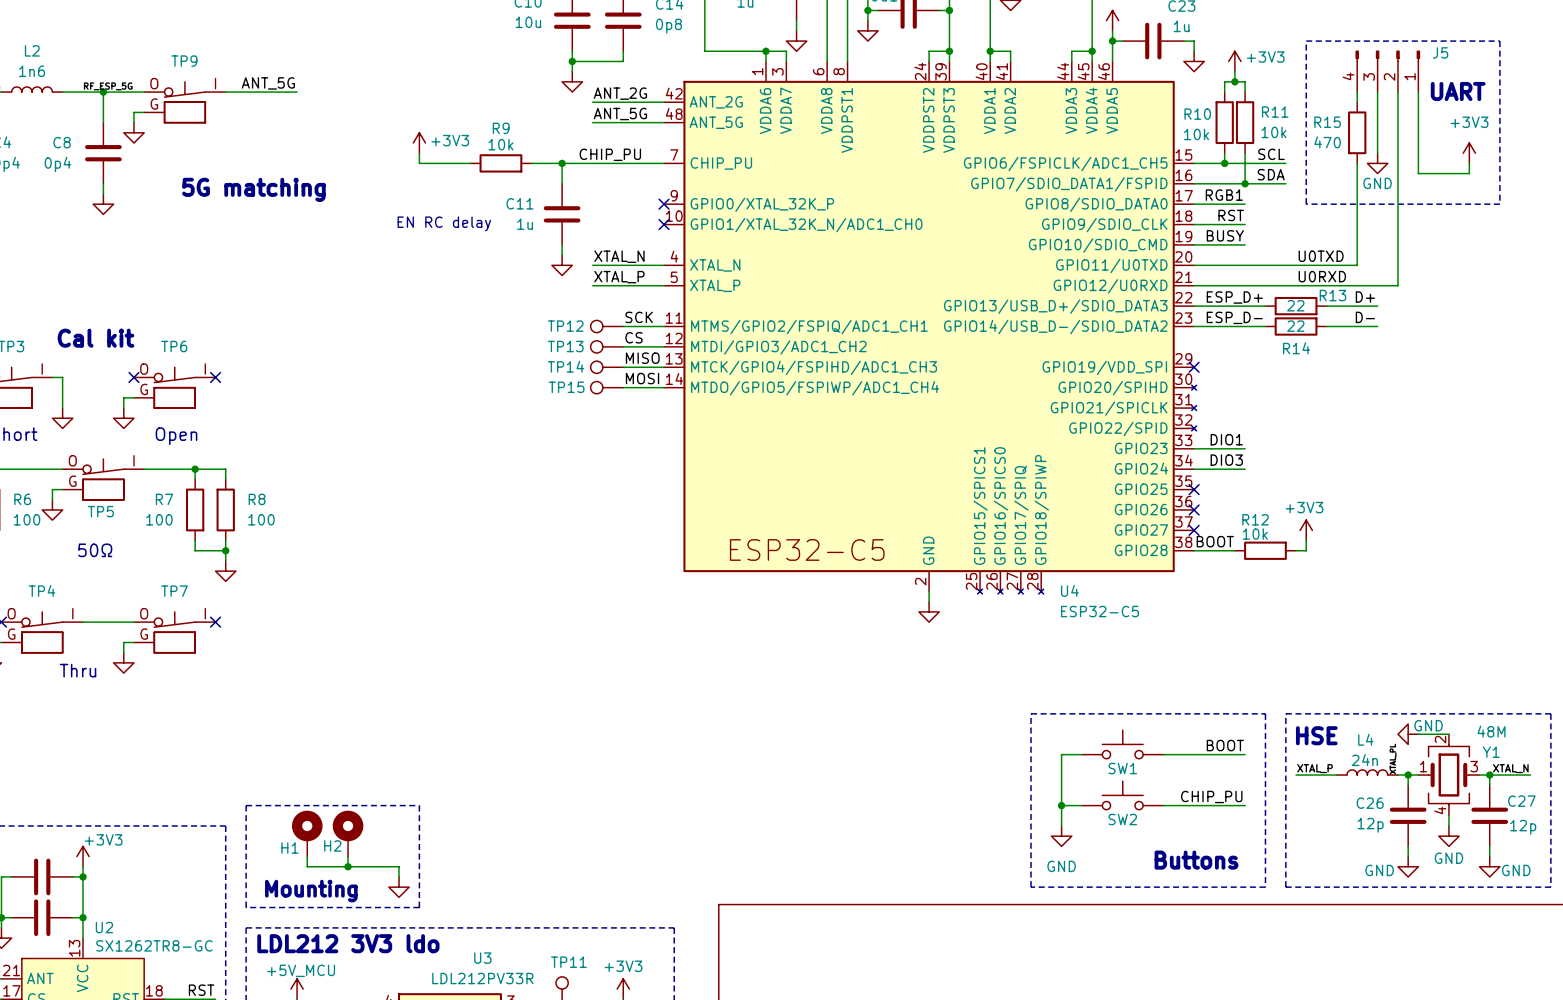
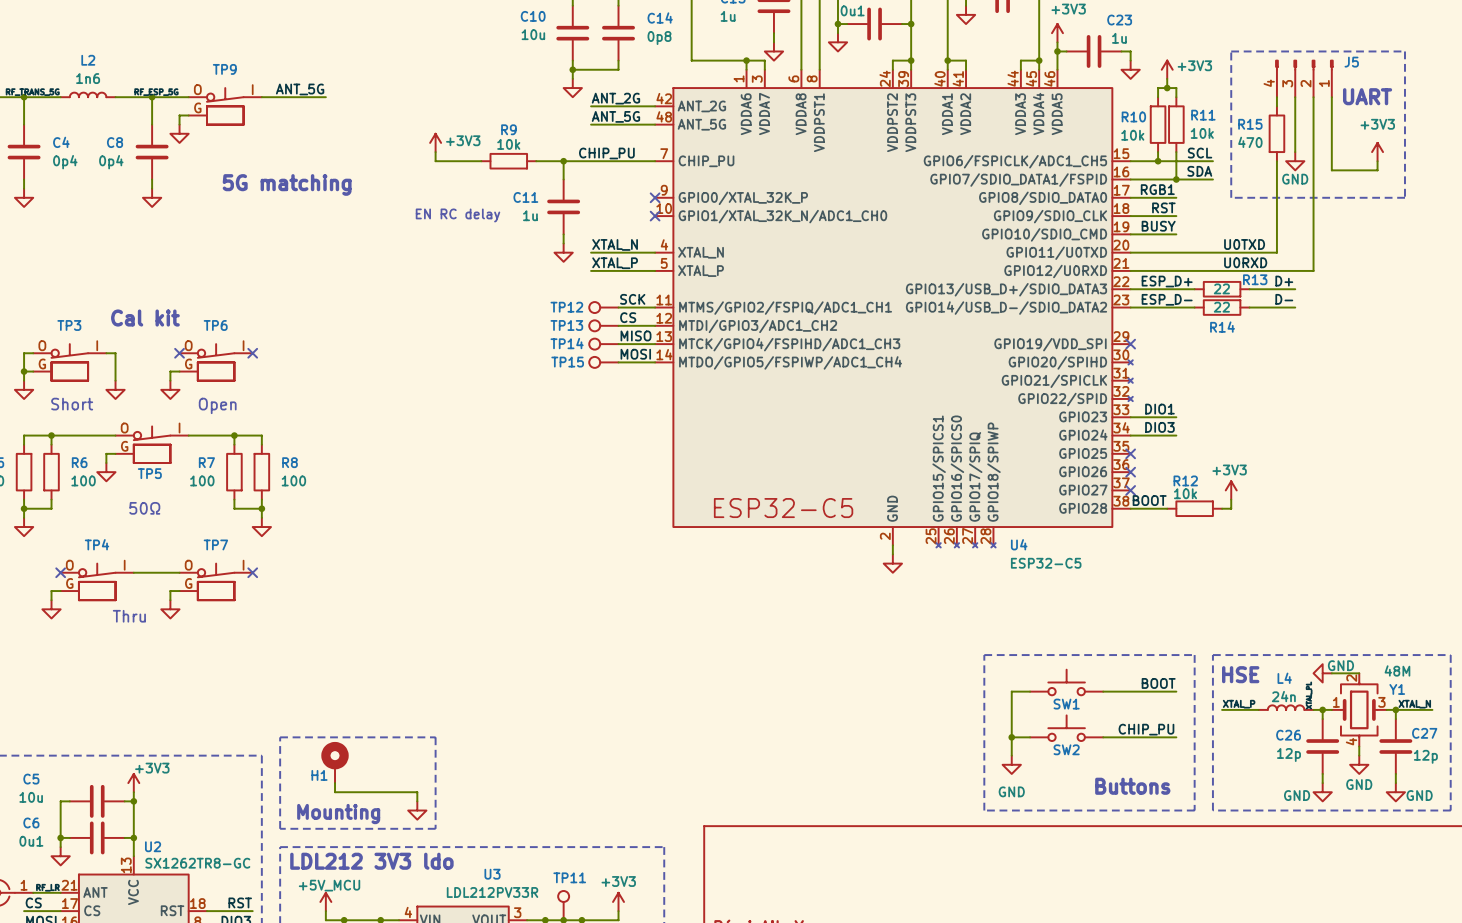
H2: (348, 833) -> none
wire: (348, 856) (348, 866) -> none
junction: (348, 866) -> none

